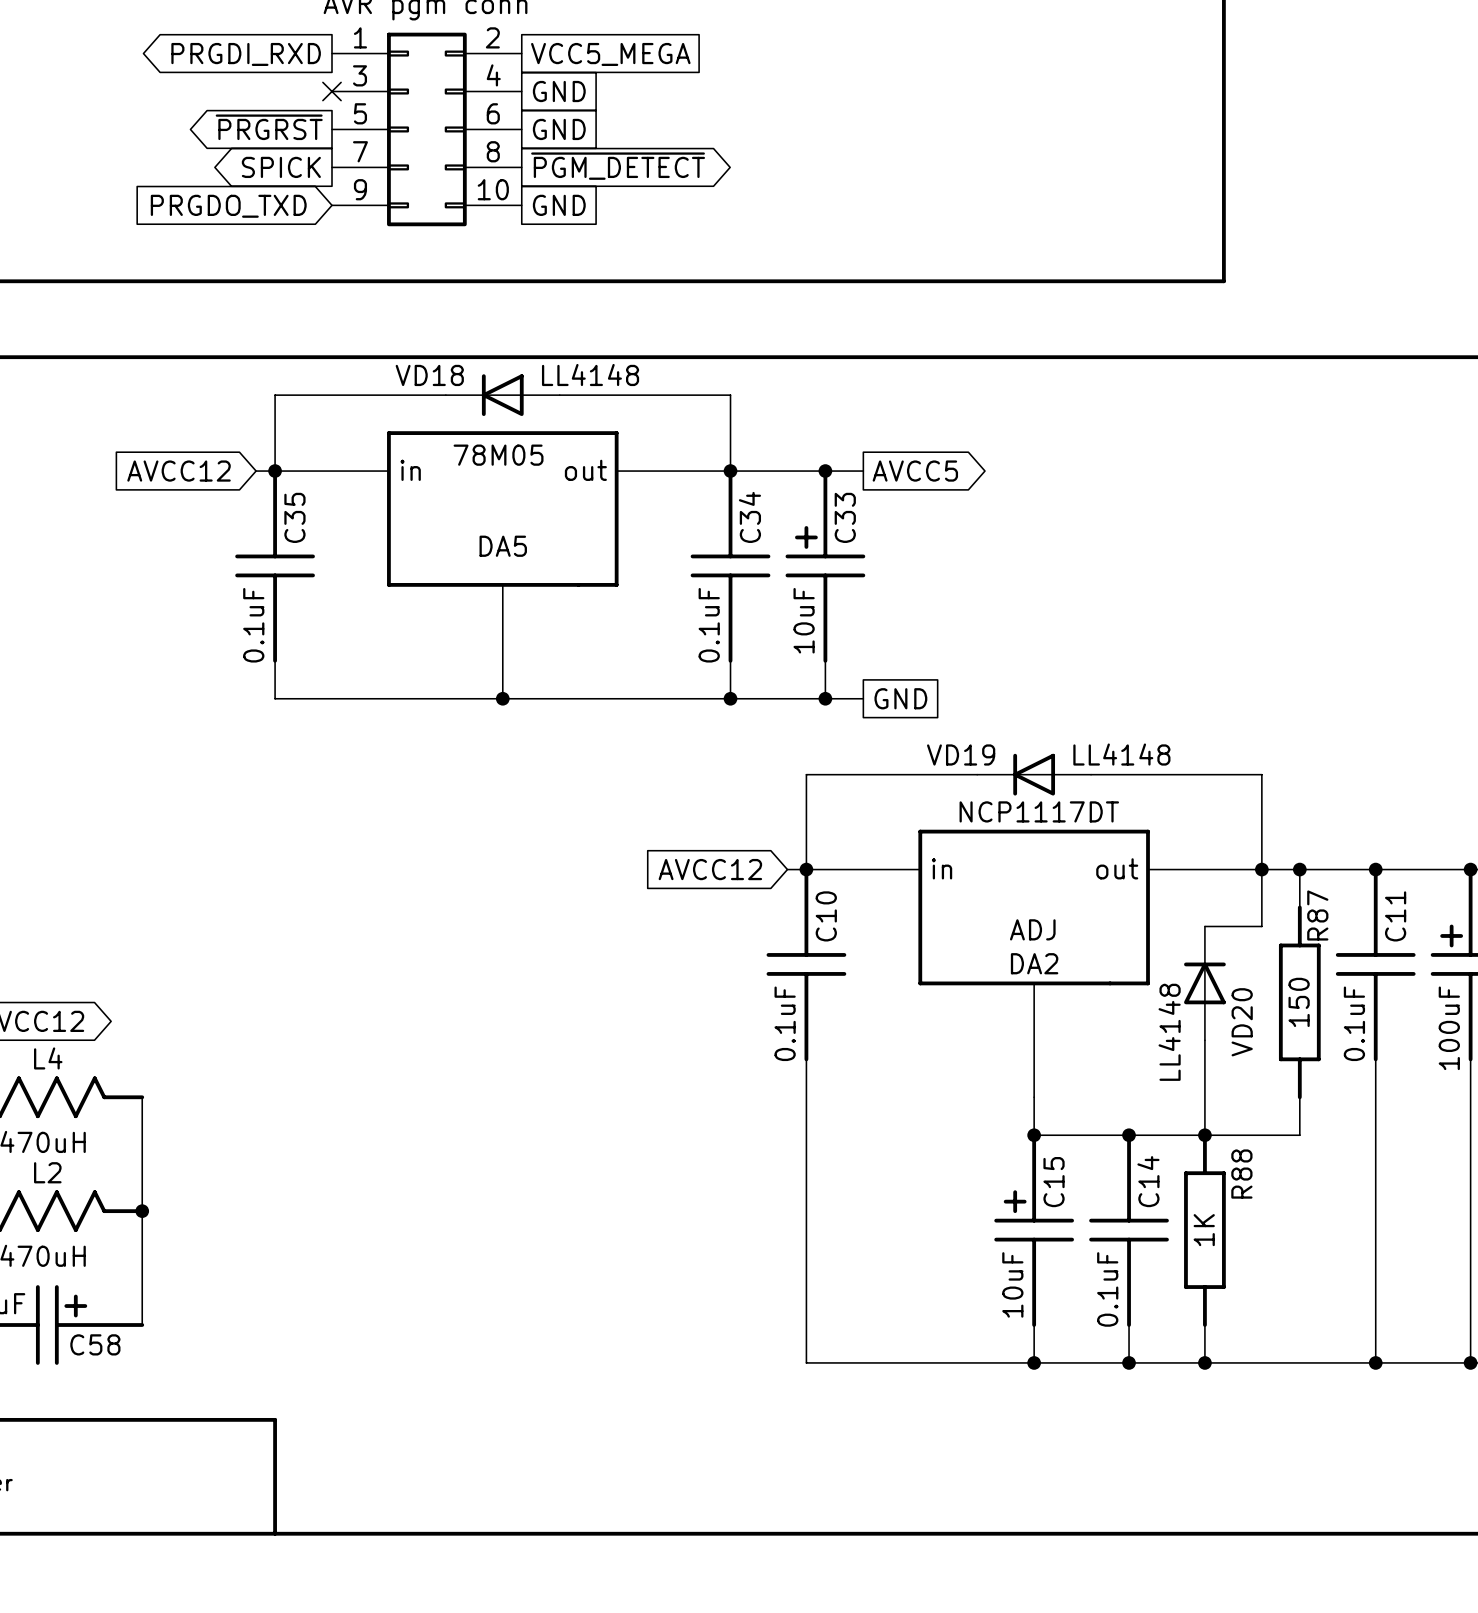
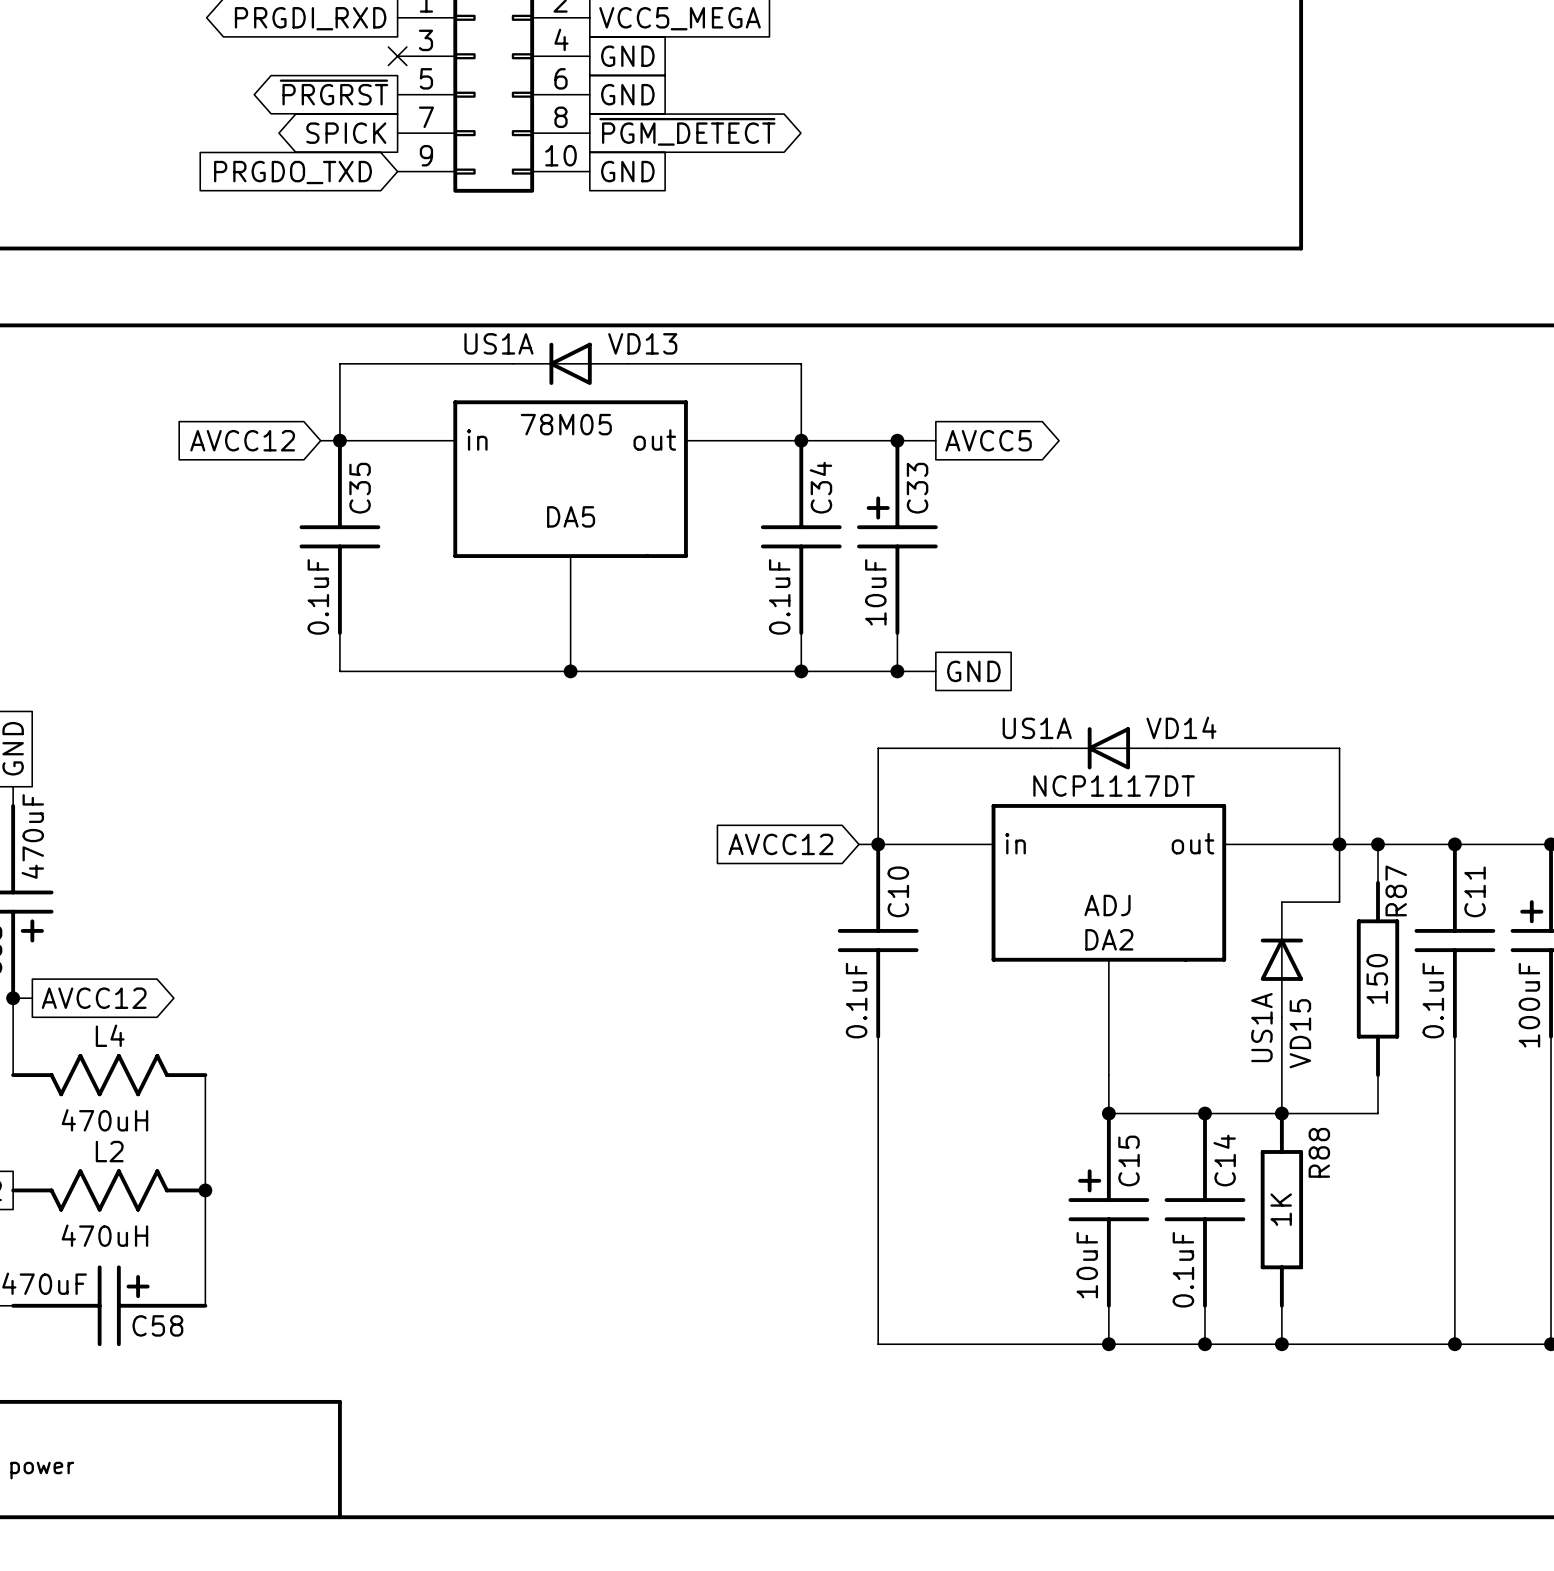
VD18 name: VD18 (429, 375) -> VD13 (642, 343)
VD18 value: LL4148 (590, 375) -> US1A (498, 343)
VD19 name: VD19 (961, 754) -> VD14 (1181, 727)
VD19 value: LL4148 (1121, 754) -> US1A (1037, 728)
VD20 name: VD20 (1242, 1022) -> VD15 (1300, 1033)
VD20 value: LL4148 (1169, 1032) -> US1A (1261, 1027)

